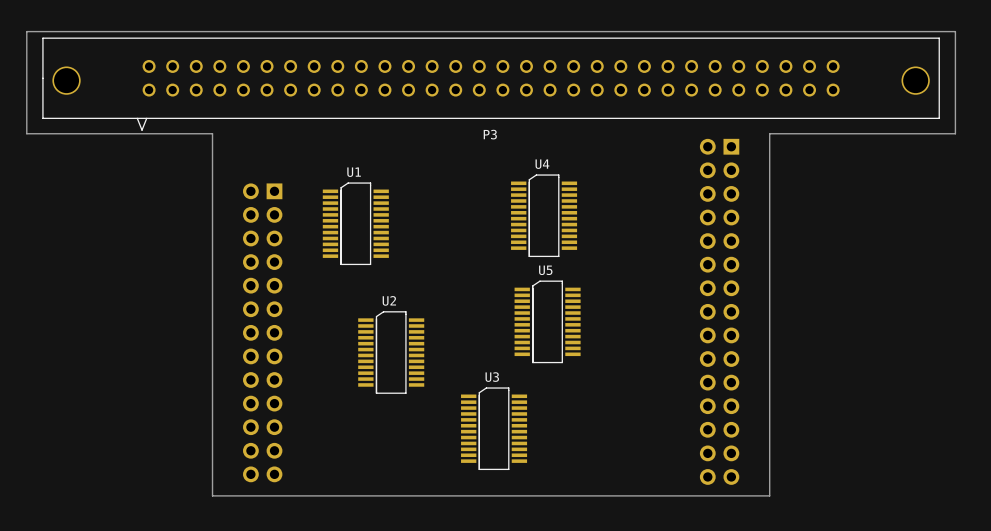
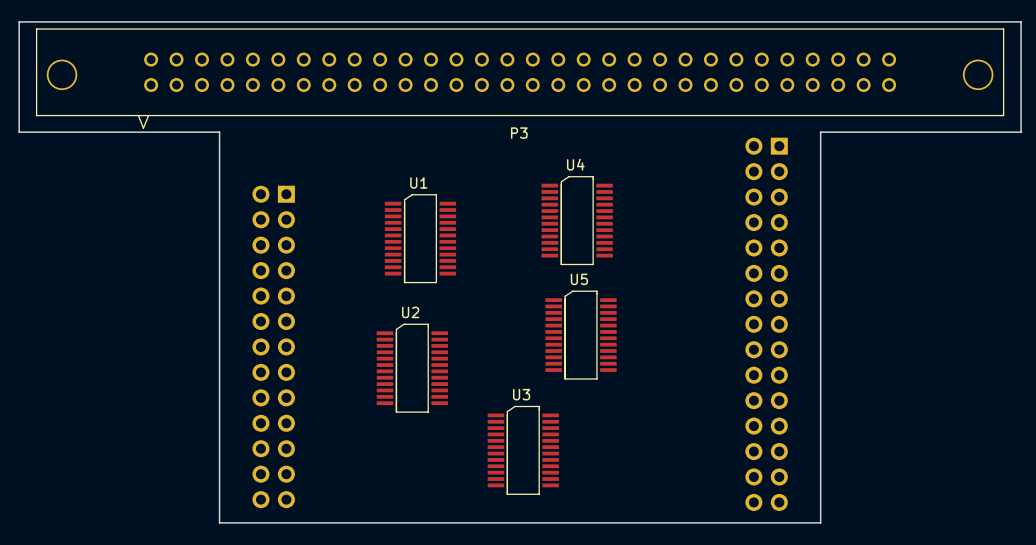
U1 position: (355, 223) -> (420, 238)

